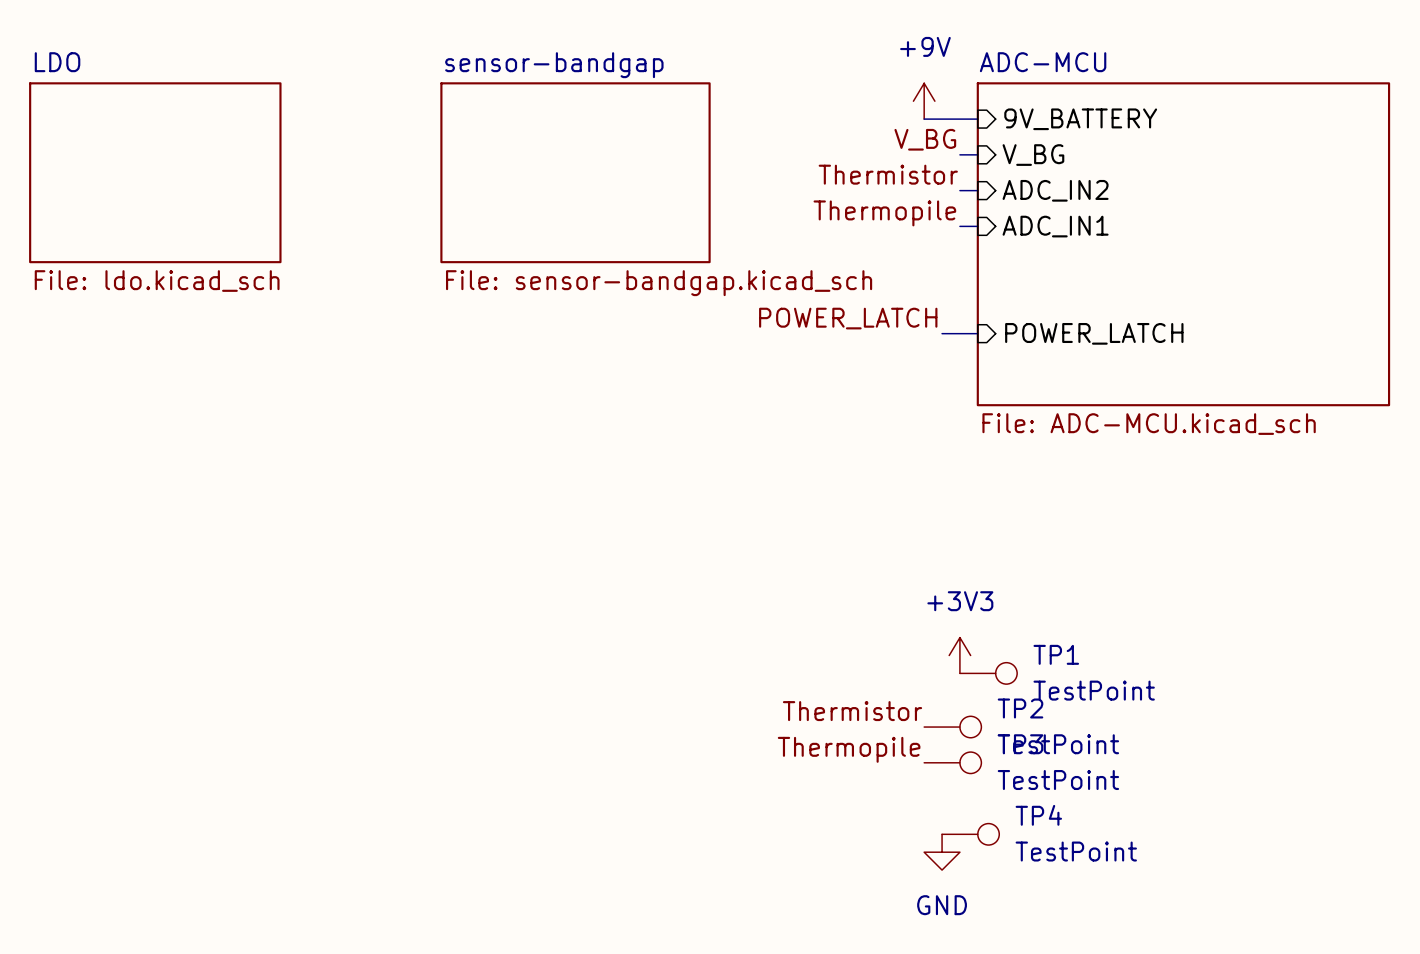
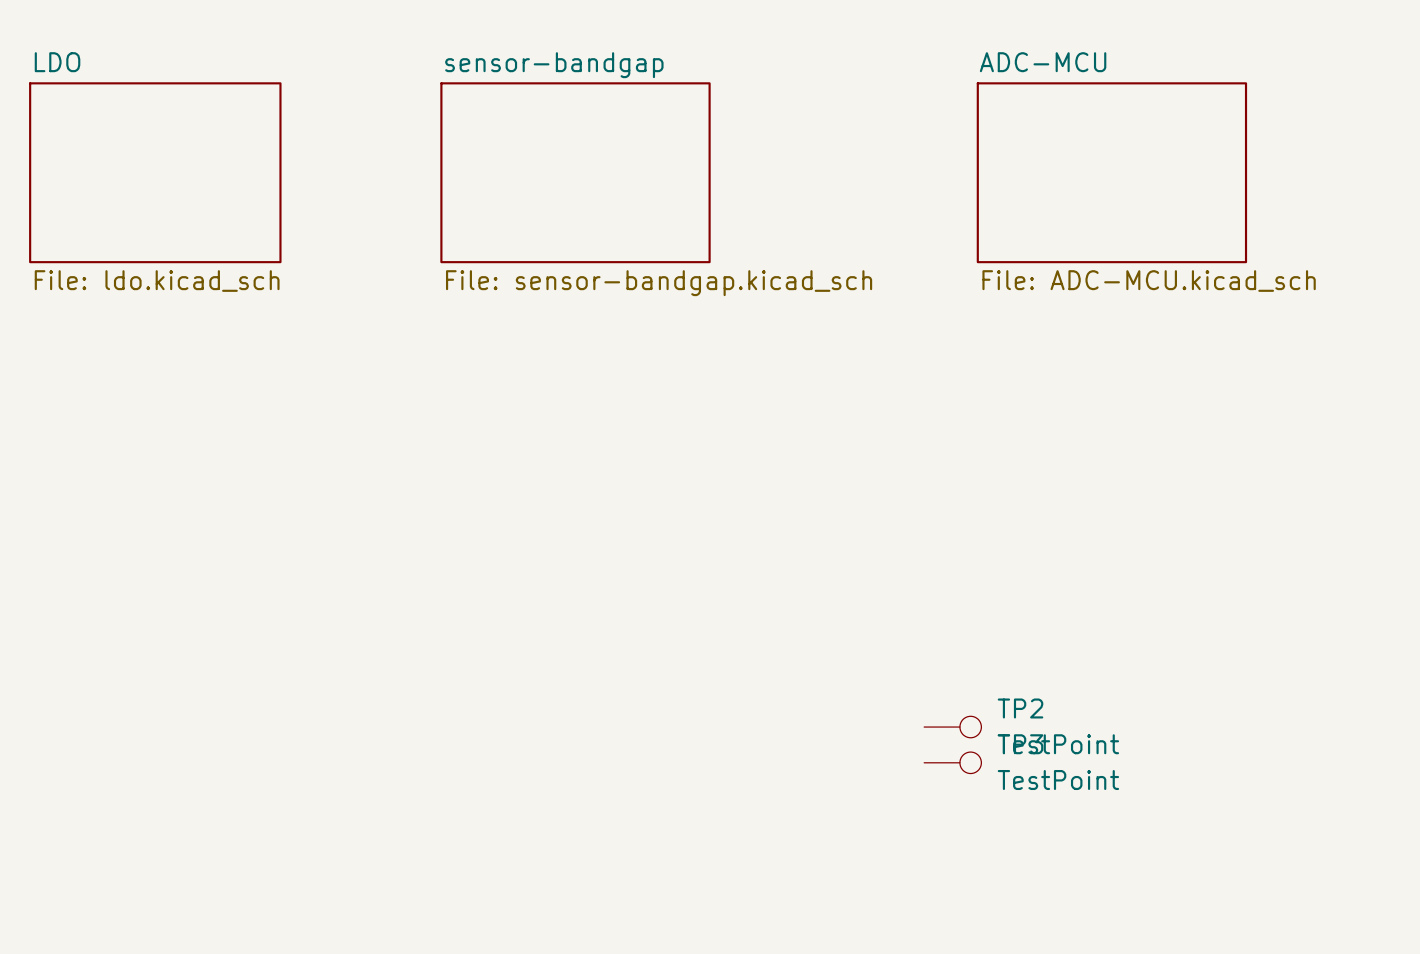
power symbol: +9V (924, 101) -> none
wire: (924, 119) (977, 119) -> none
sheet pin: 9V_BATTERY (1080, 119) -> none
label: V_BG (925, 139) -> none
wire: (959, 154) (977, 154) -> none
sheet pin: V_BG (1033, 155) -> none
sheet ADC-MCU: none -> File: ADC-MCU.kicad_sch (1111, 172)
label: Thermistor (888, 174) -> none
wire: (959, 190) (977, 190) -> none
sheet pin: ADC_IN2 (1055, 190) -> none
label: Thermopile (884, 213) -> none
wire: (959, 226) (977, 226) -> none
sheet pin: ADC_IN1 (1055, 226) -> none
sheet ADC-MCU: File: ADC-MCU.kicad_sch (1183, 244) -> none
label: POWER_LATCH (848, 318) -> none
wire: (942, 333) (977, 333) -> none
sheet pin: POWER_LATCH (1094, 333) -> none
power symbol: +3V3 (959, 655) -> none
TP1: TestPoint (988, 673) -> none
label: Thermistor (852, 711) -> none
label: Thermopile (849, 749) -> none
TP4: TestPoint (970, 834) -> none
power symbol: GND (942, 852) -> none

